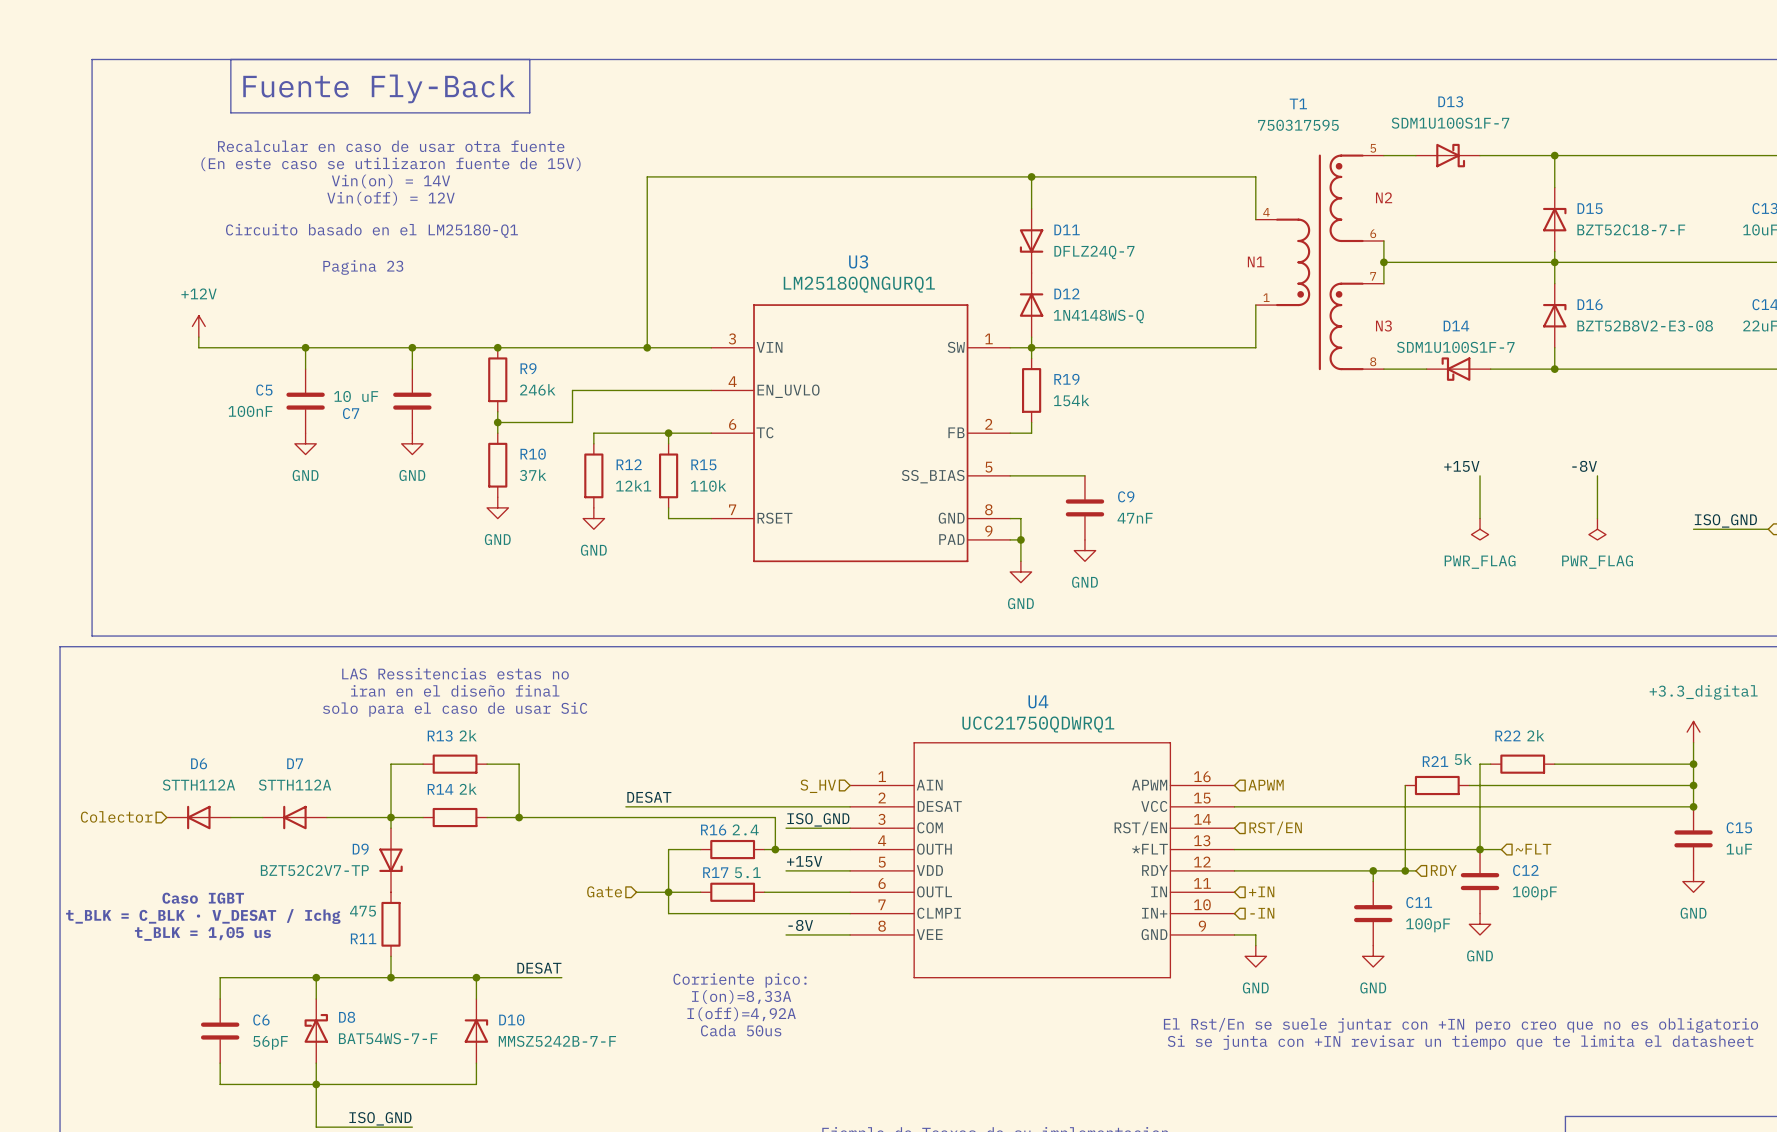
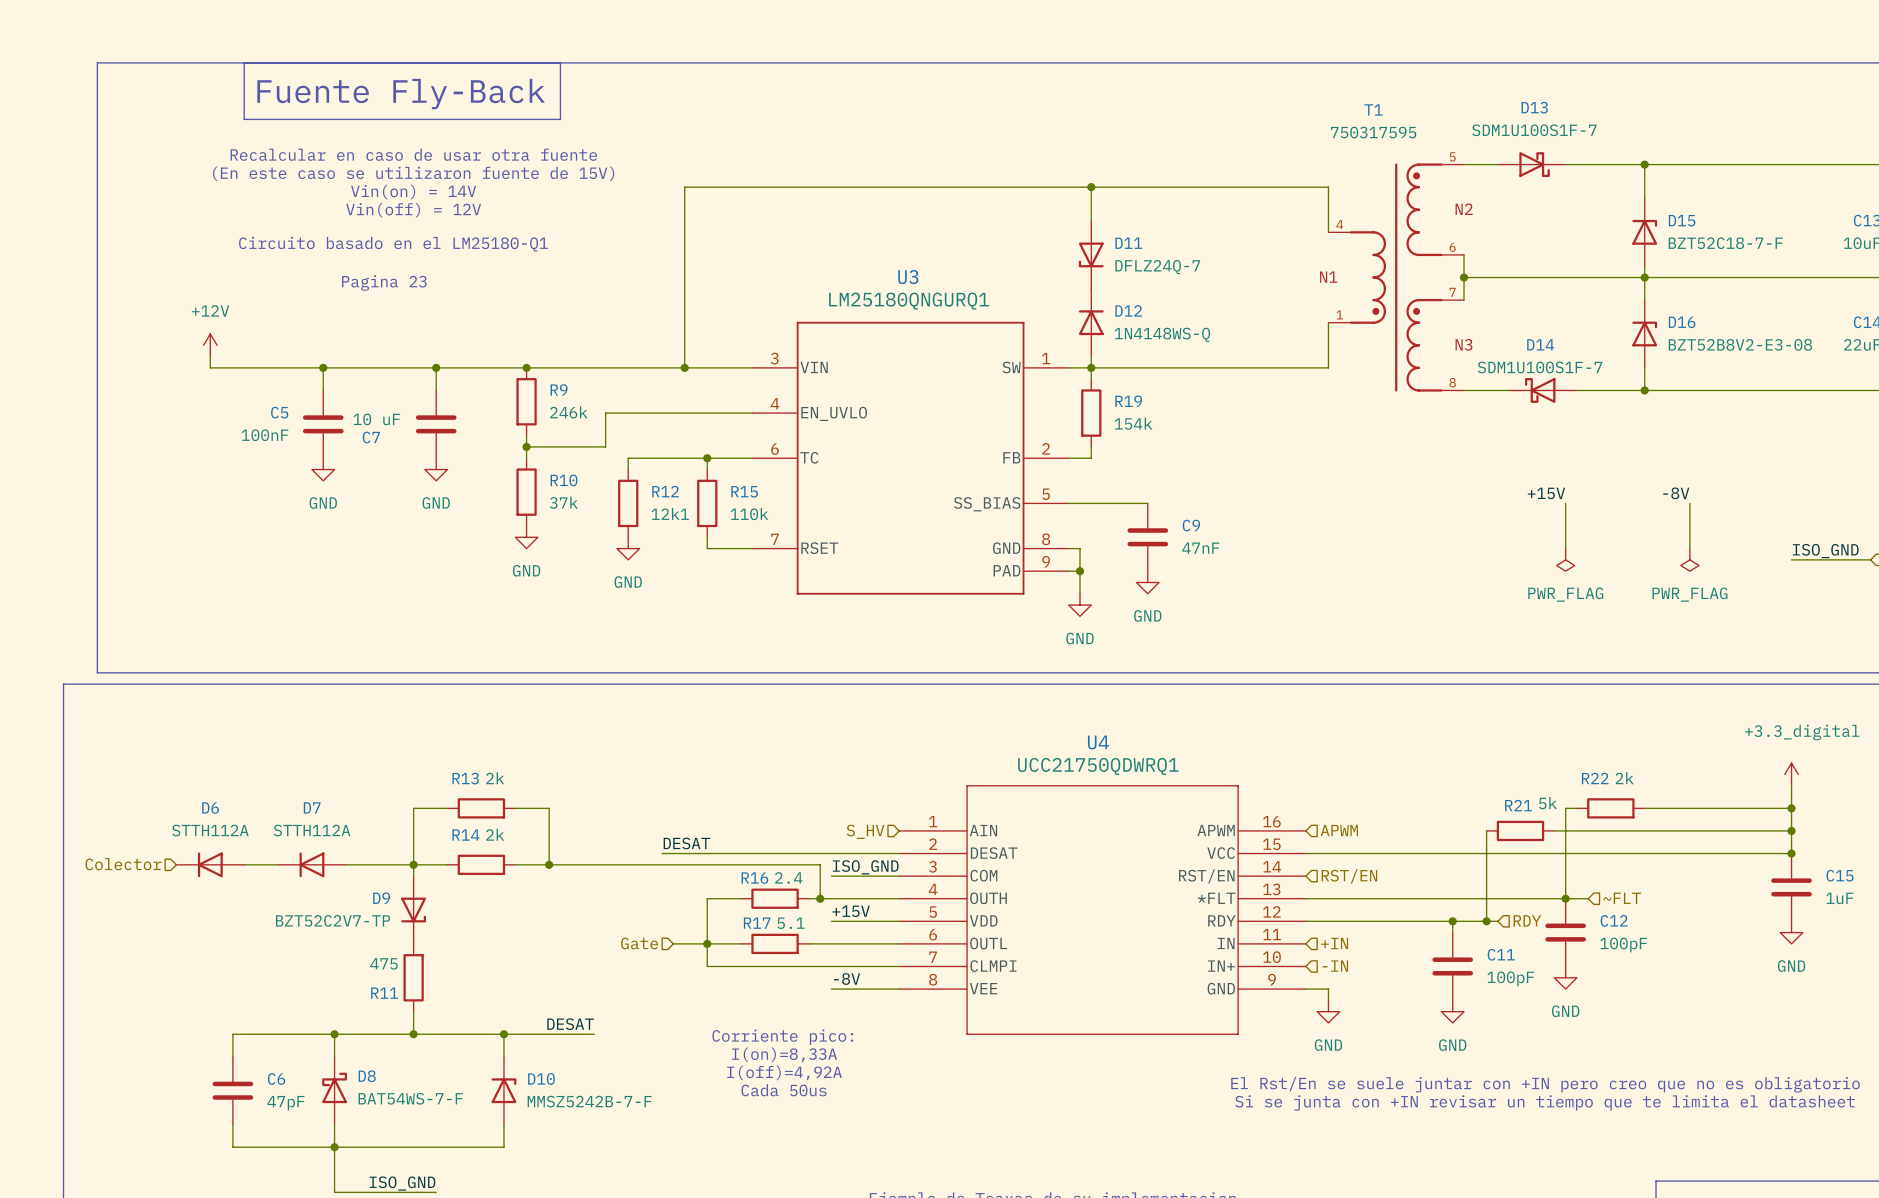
text: LAS Ressitencias estas no (455, 673) -> none
text: iran en el diseño final (455, 690) -> none
text: solo para el caso de usar SiC (455, 709) -> none
text: Caso IGBT (203, 898) -> none
text: t_BLK = C_BLK · V_DESAT / Ichg (203, 916) -> none
text: t_BLK = 1,05 us (202, 933) -> none
C6 value: 56pF (270, 1042) -> 47pF (285, 1103)

